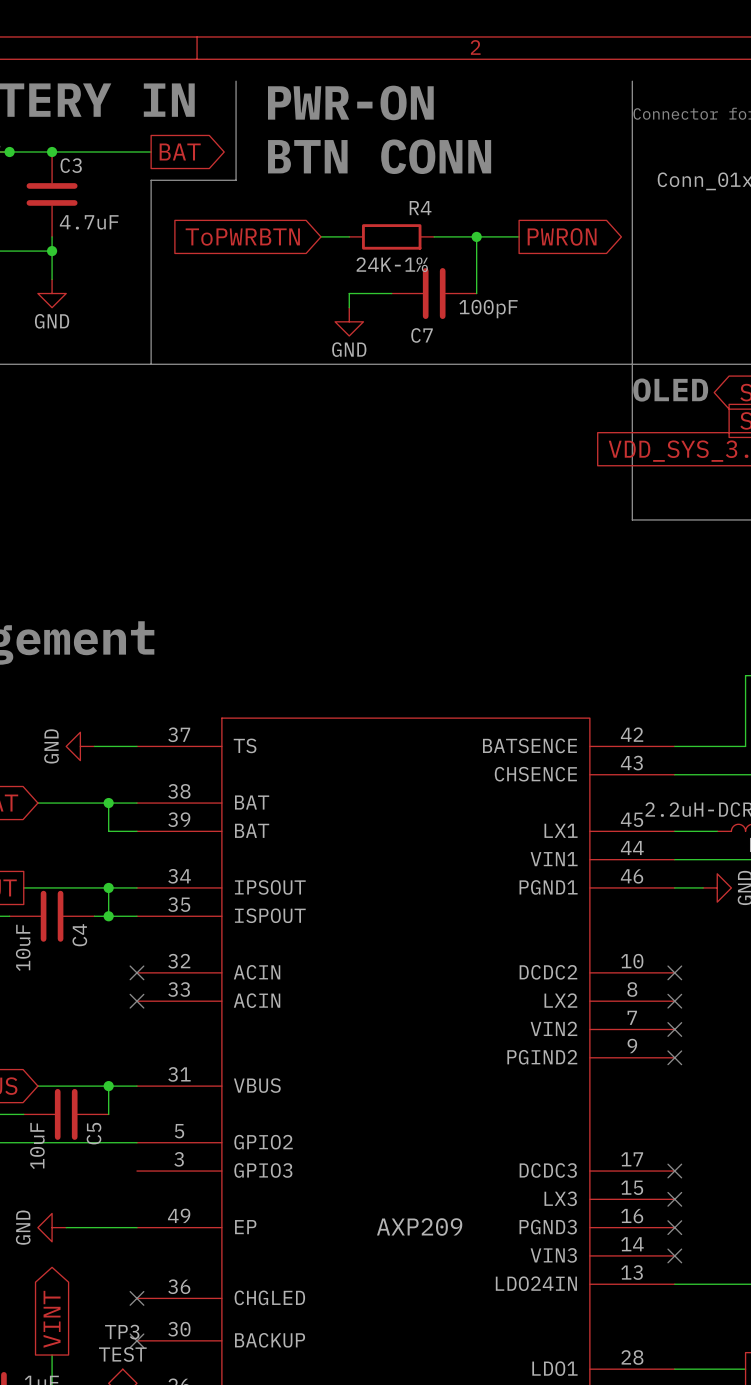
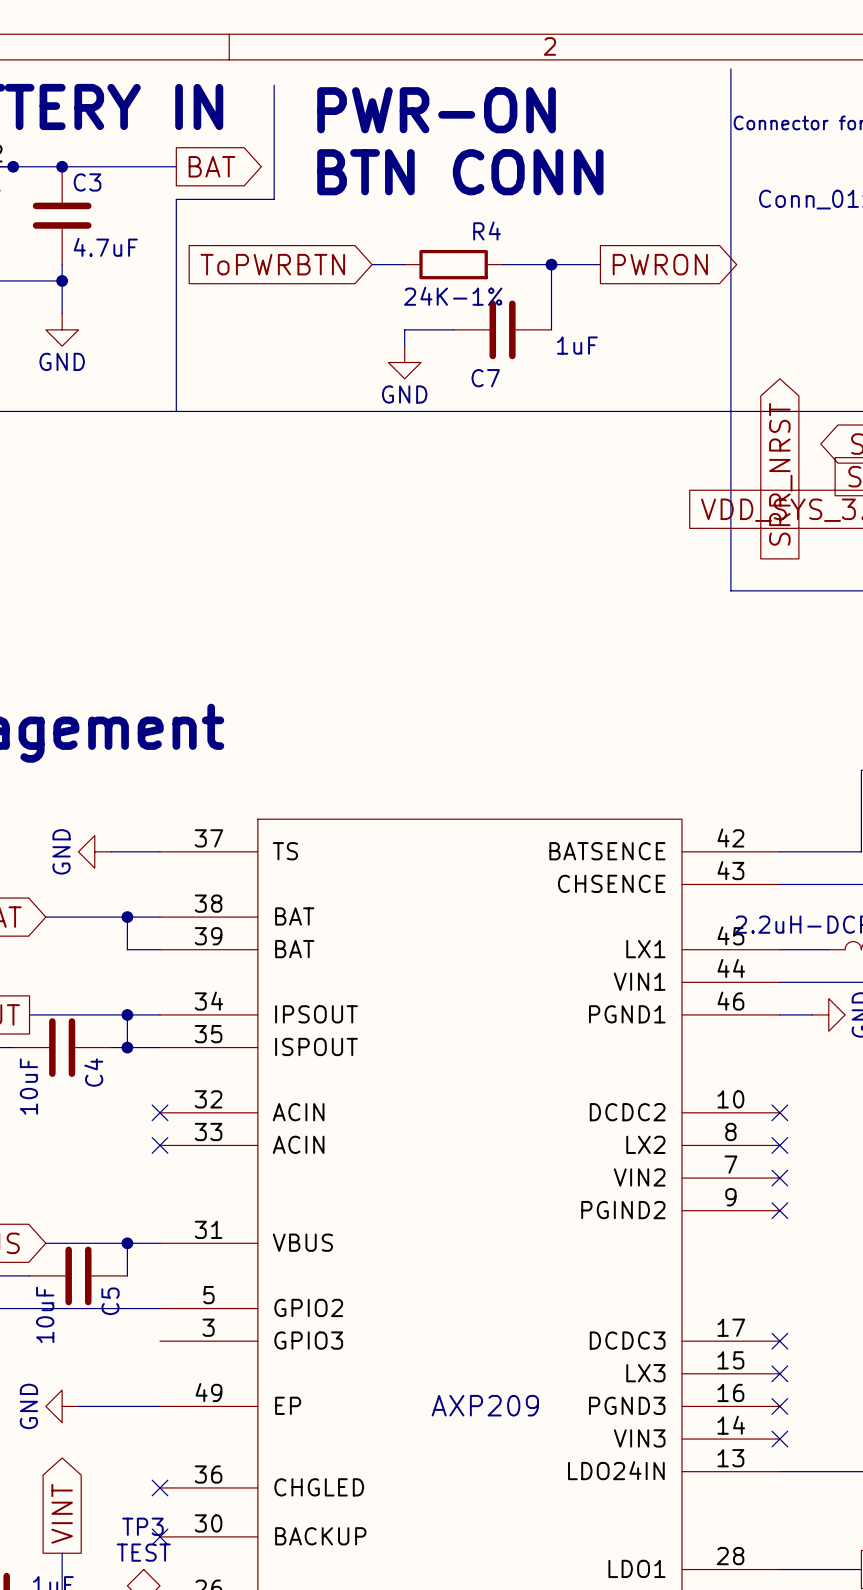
line: none -> (730, 68) (730, 85)
C7 value: 100pF (488, 309) -> 1uF (577, 345)
text: OLED (670, 390) -> none
global label: none -> SRR_NRST (780, 474)

